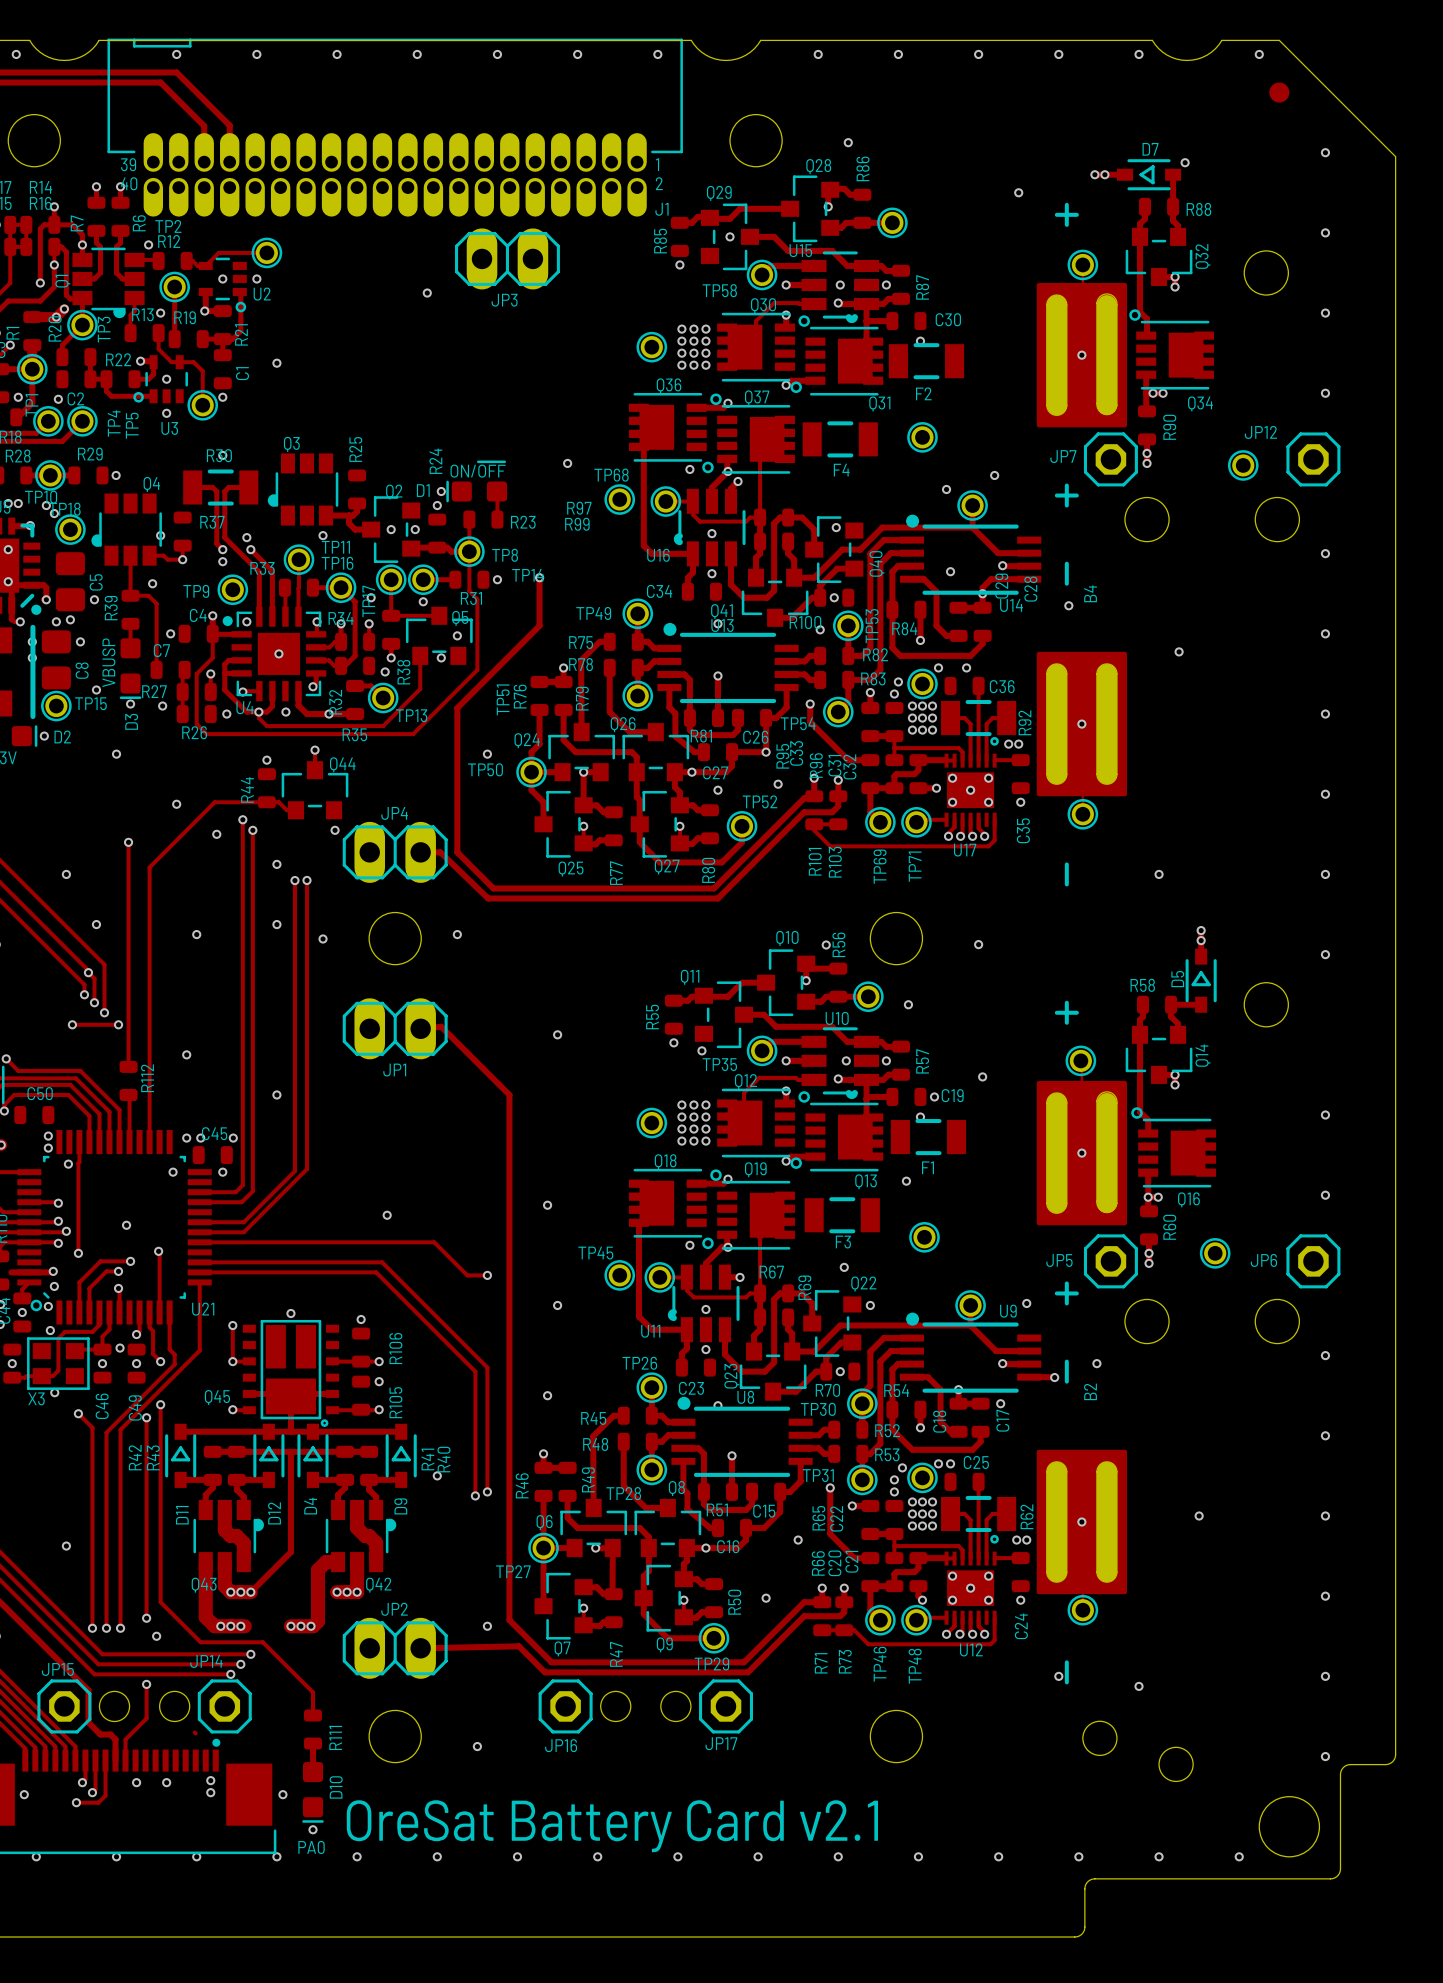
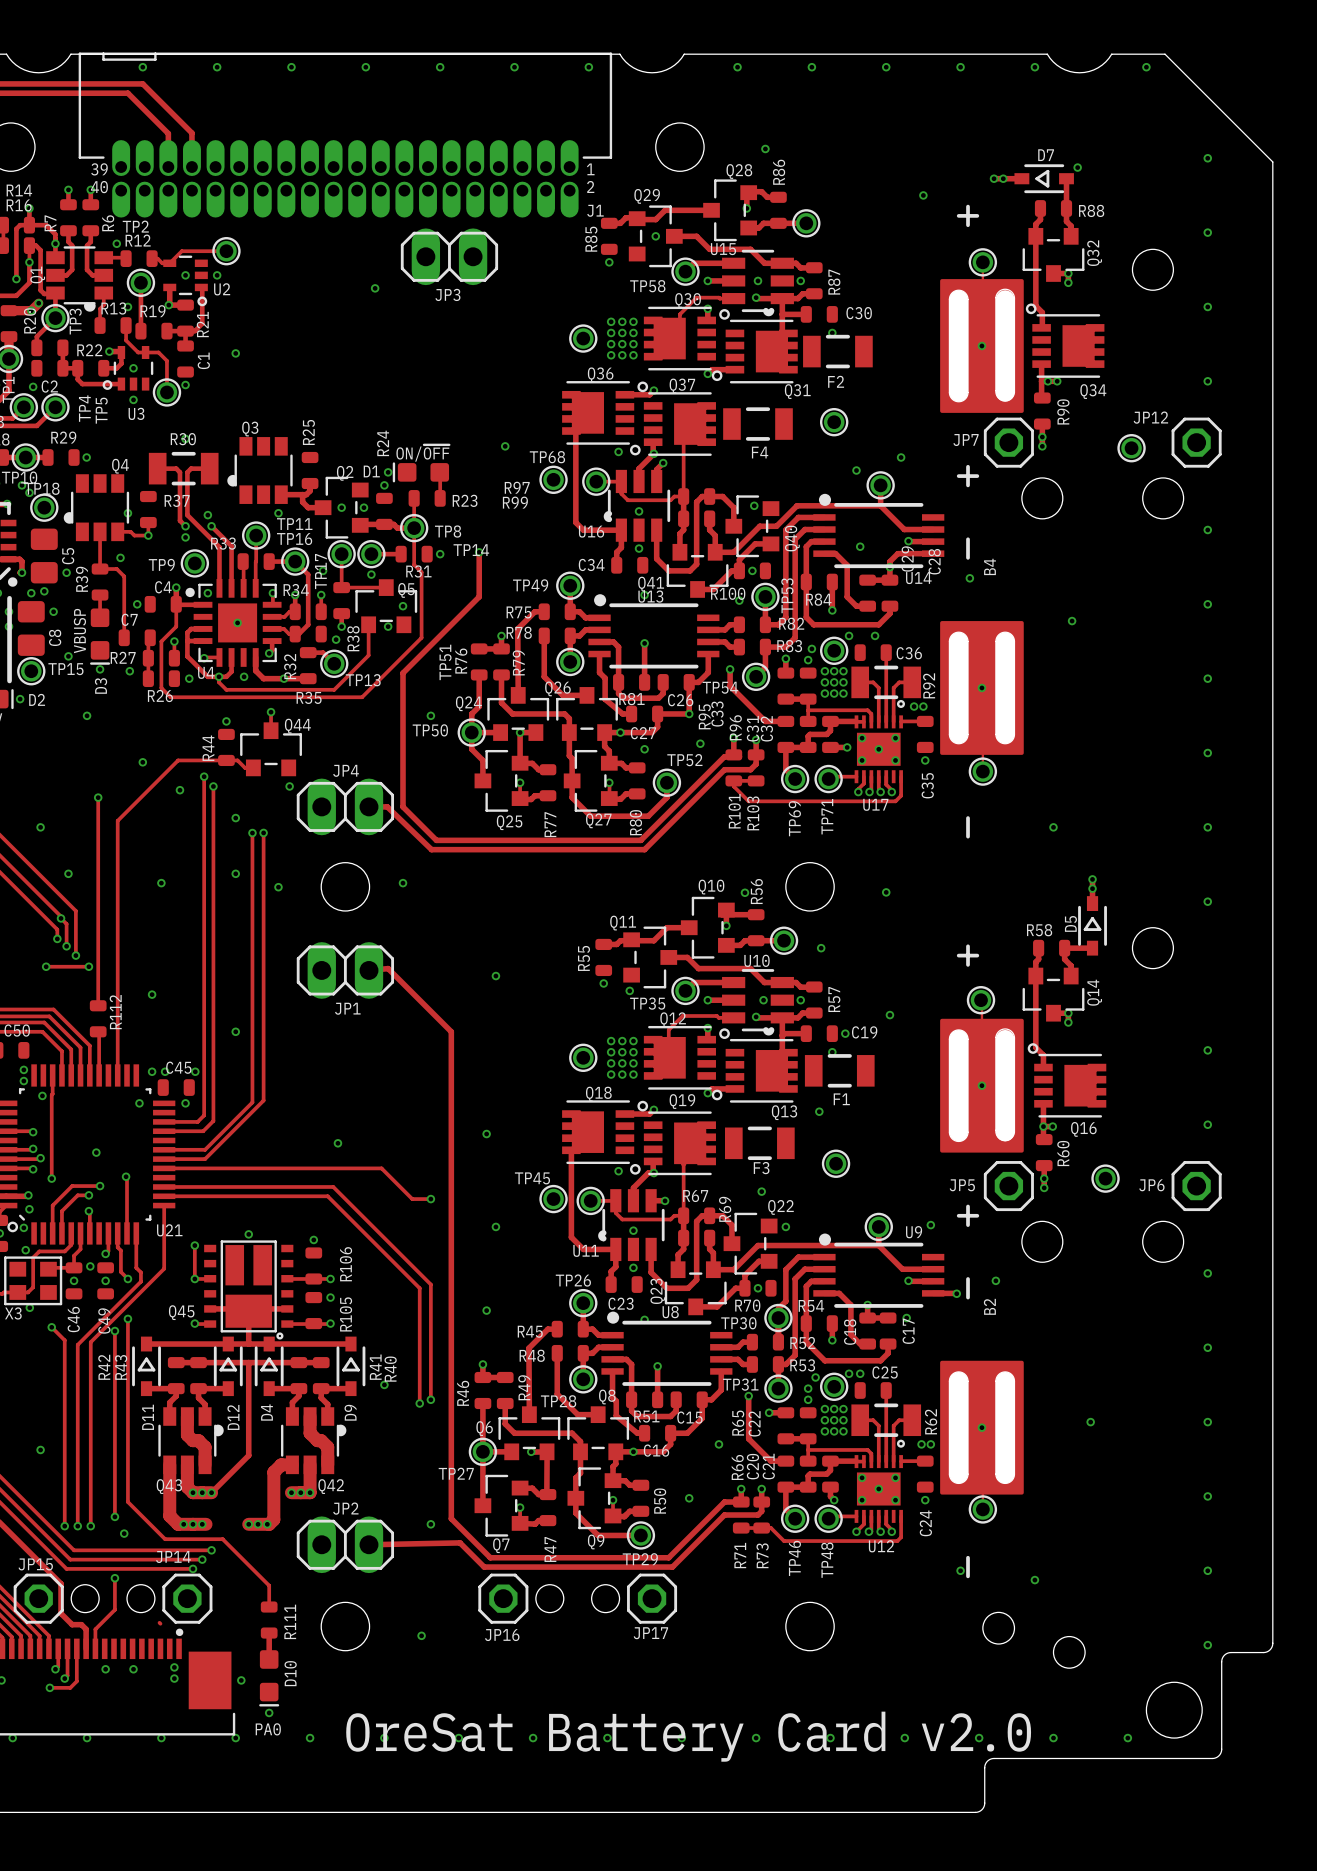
part: (1279, 92) -> none
text: OreSat Battery Card v2.1 (612, 1826) -> OreSat Battery Card v2.0 (688, 1736)

